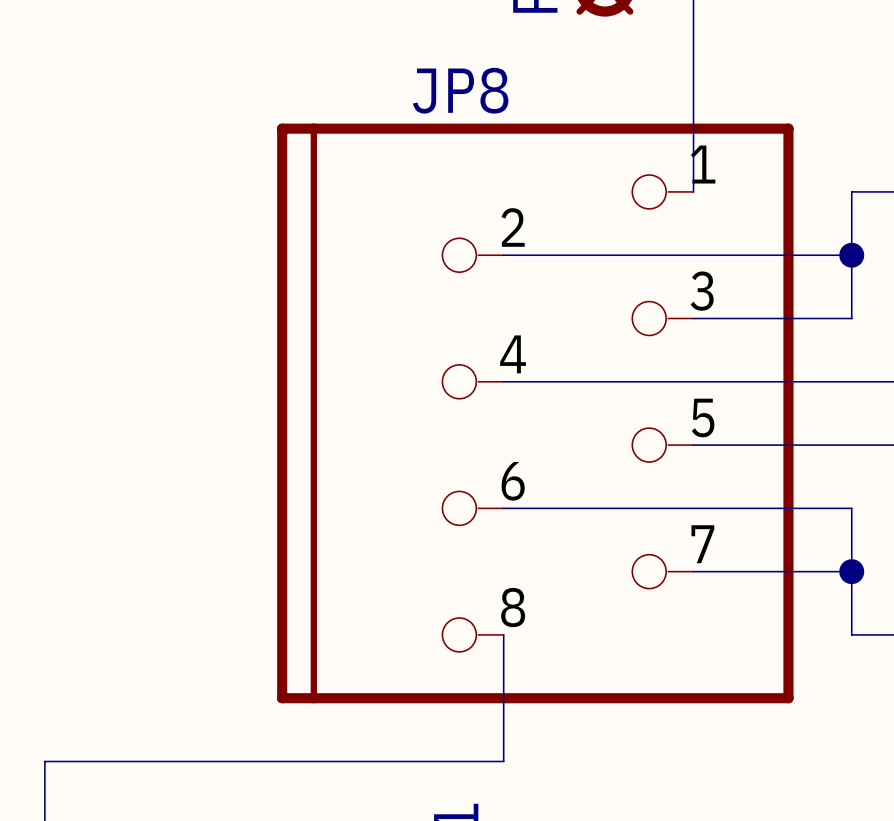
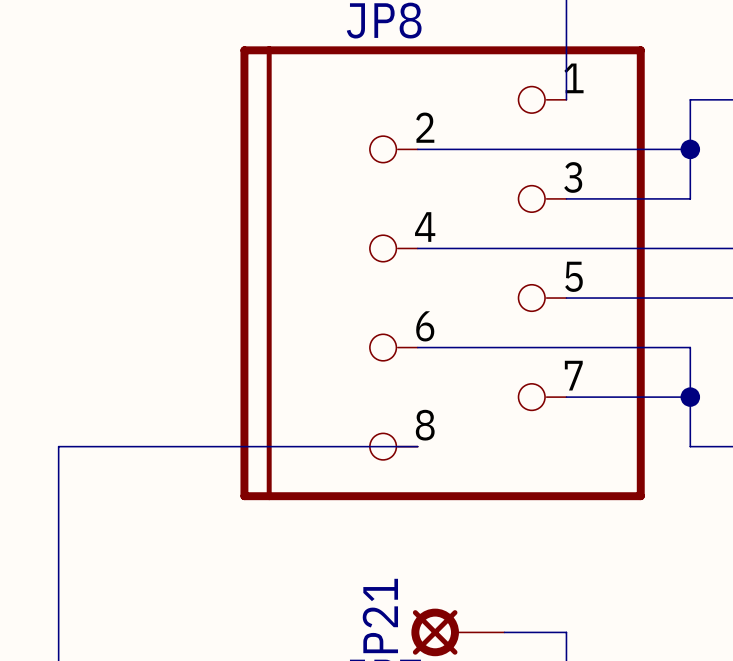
wire: (503, 634) (503, 761) (44, 761) -> (417, 446) (58, 446) (58, 545)

